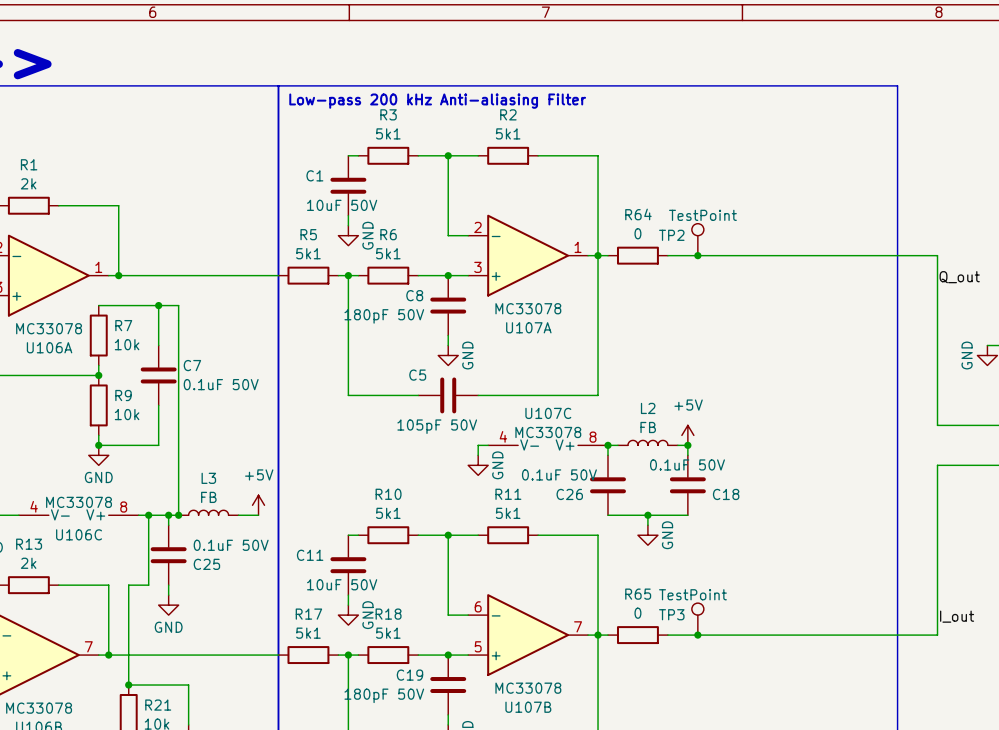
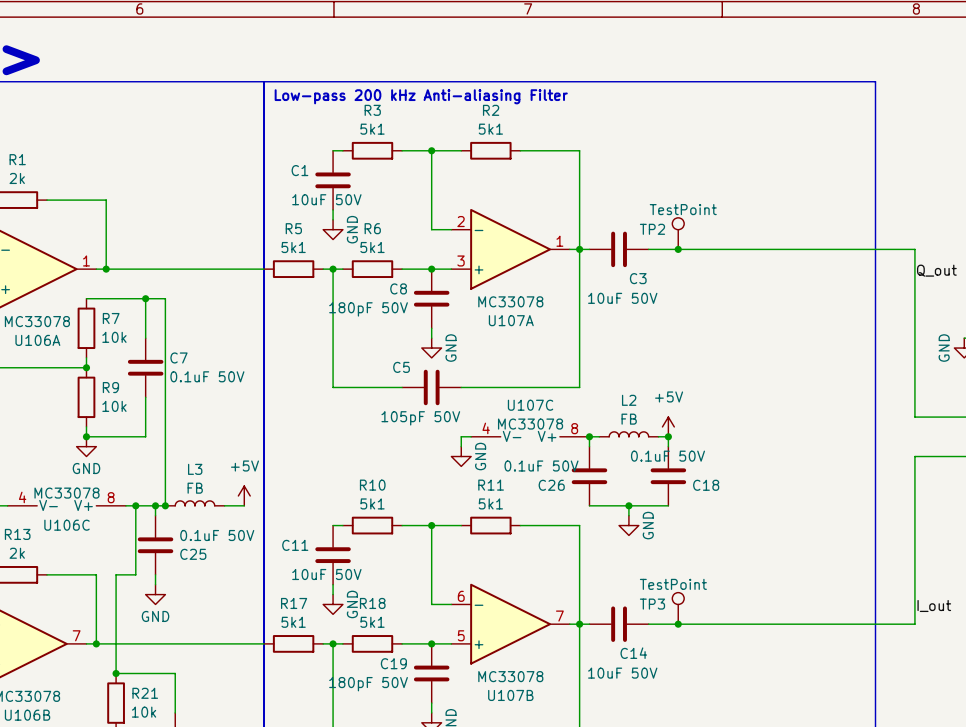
R64: 0 (637, 255) -> none
C3: none -> 10uF 50V (619, 249)
R65: 0 (637, 635) -> none
C14: none -> 10uF 50V (619, 624)

